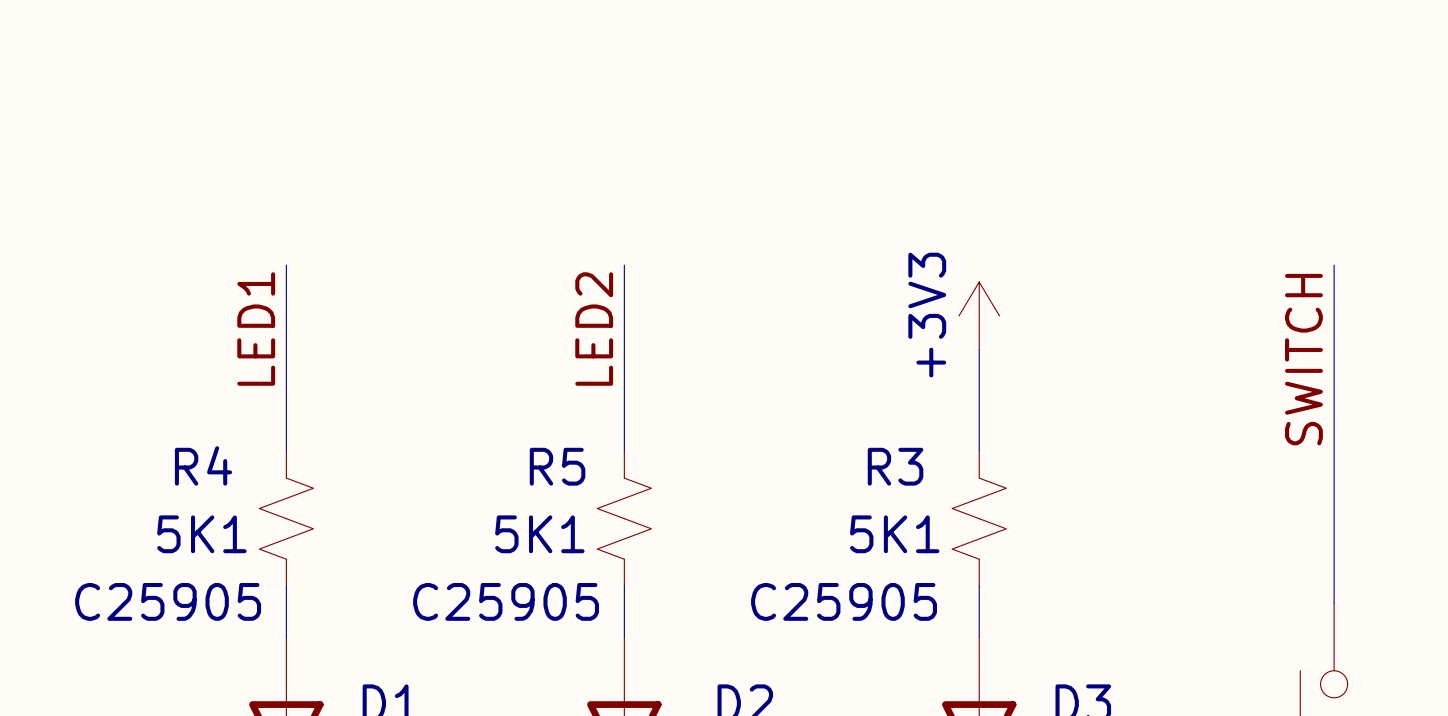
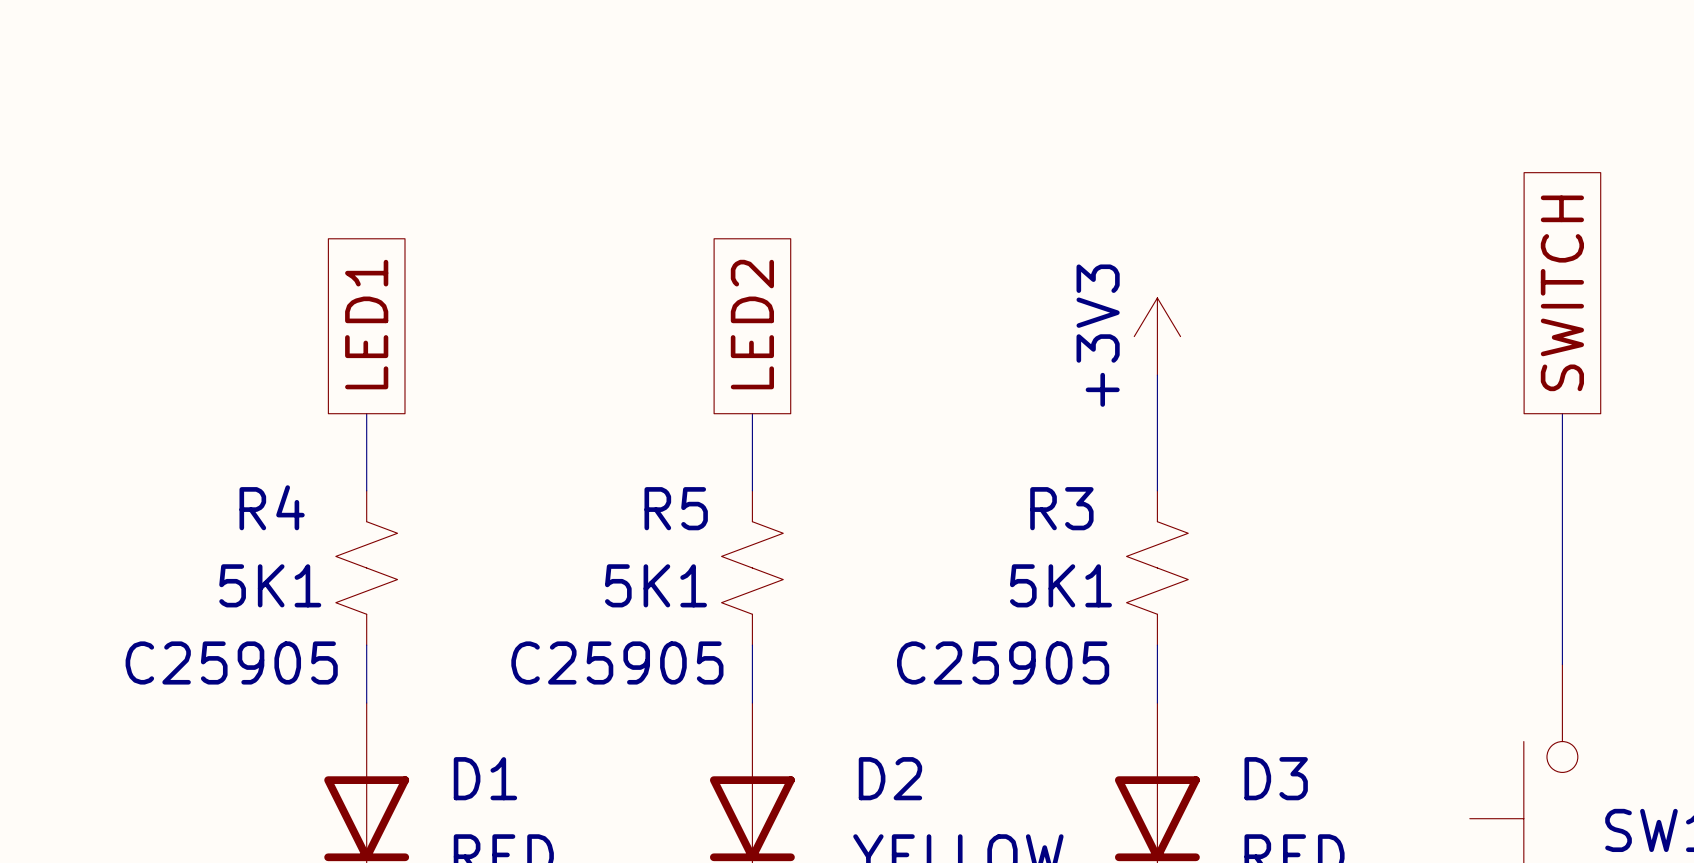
wire: (286, 265) (286, 383) -> none
wire: (624, 265) (624, 383) -> none
wire: (1334, 265) (1334, 383) -> none
global label: none -> SWITCH (1562, 293)
global label: none -> LED1 (366, 324)
global label: none -> LED2 (752, 324)
label: LED1 (256, 329) -> none
label: LED2 (594, 329) -> none
label: SWITCH (1303, 359) -> none

